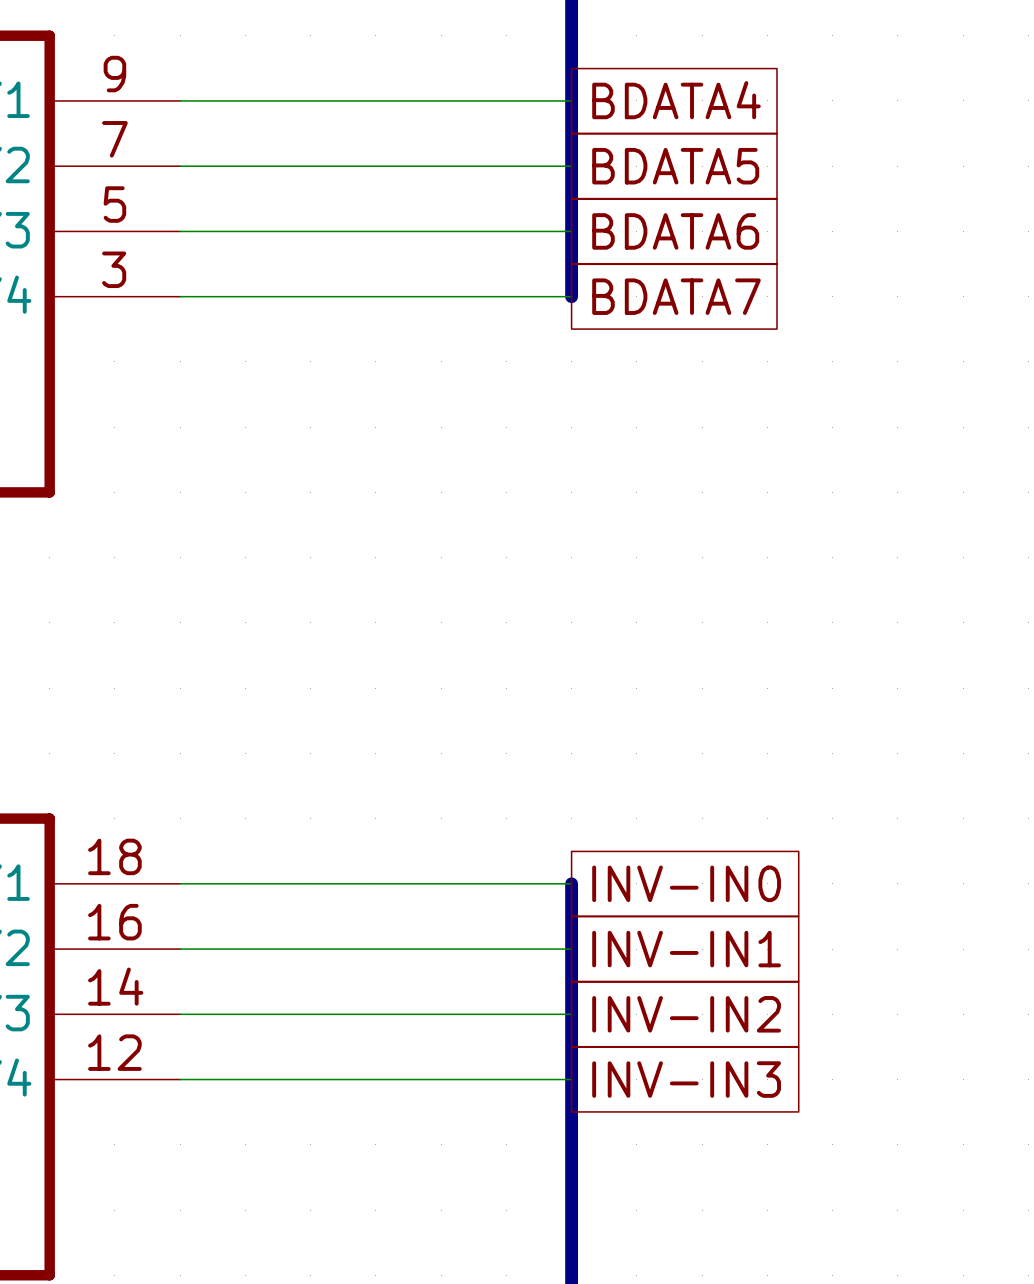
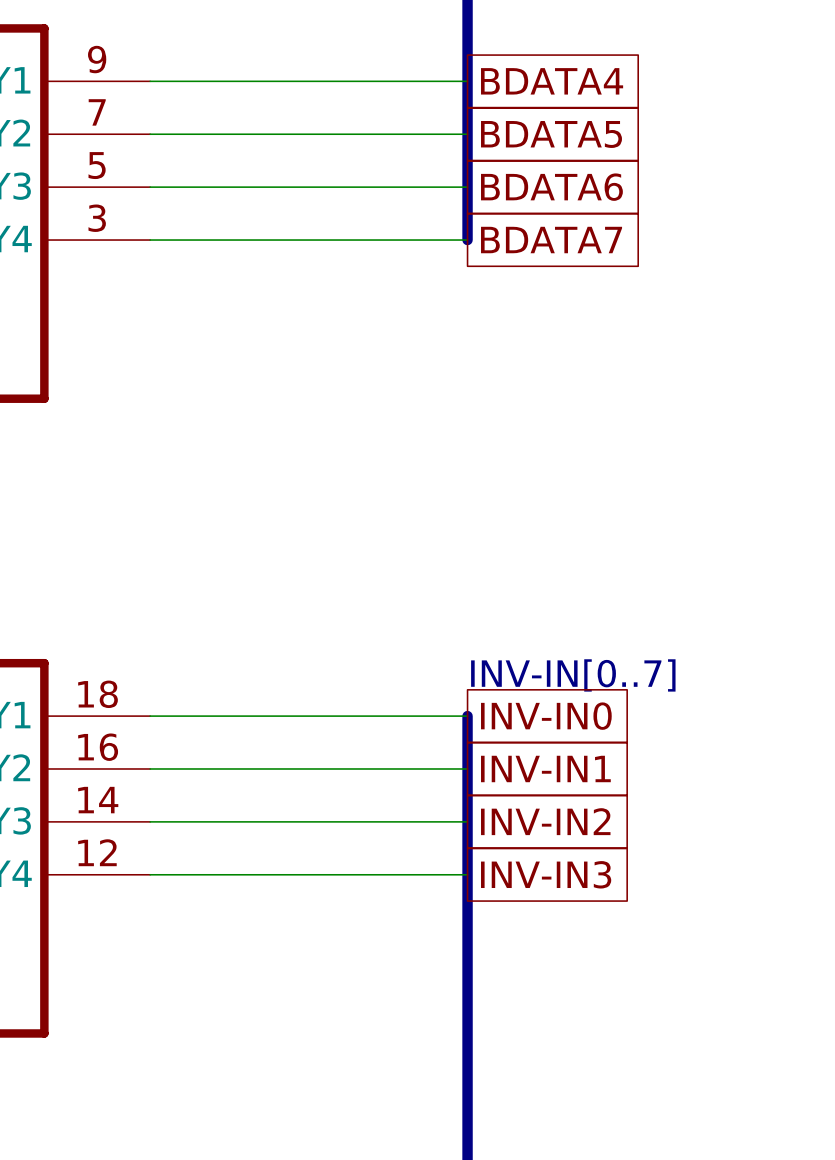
text: none -> INV-IN[0..7] (573, 675)

